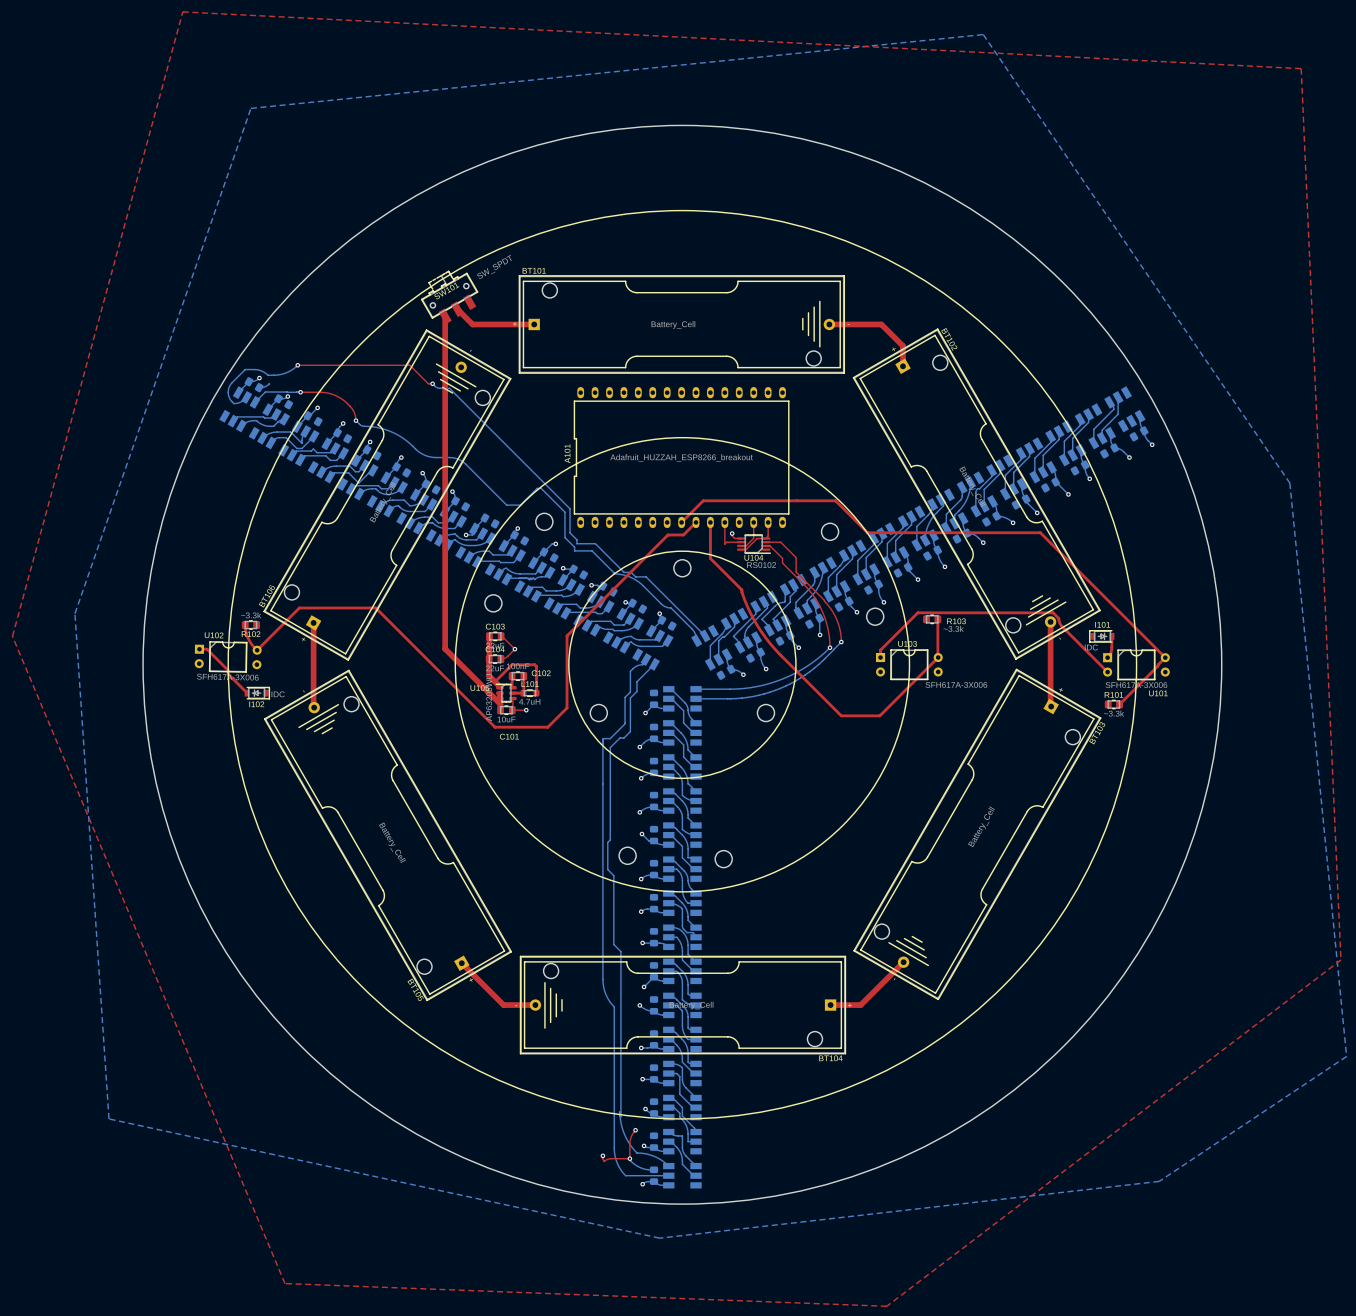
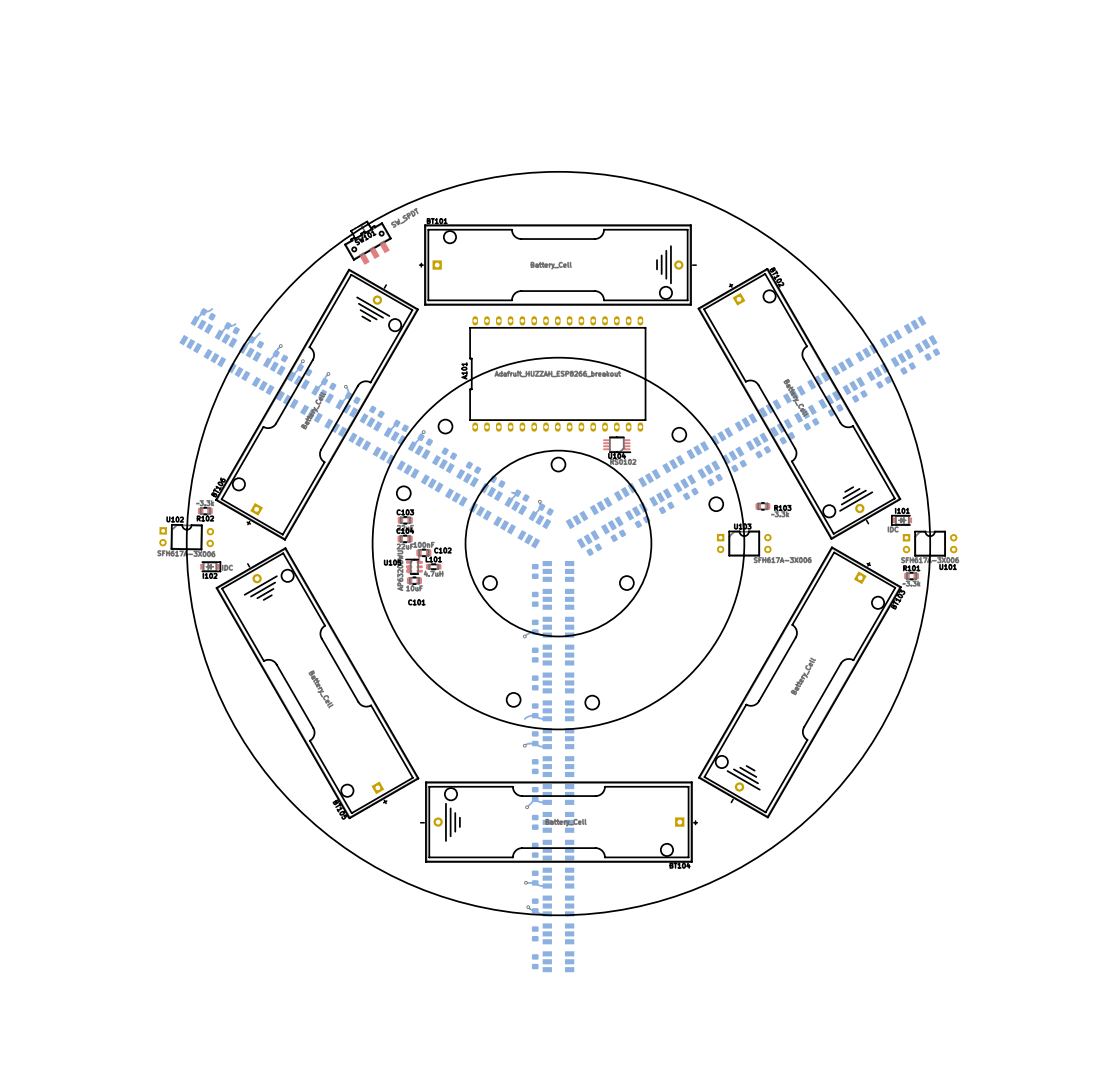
top zone outline: (182, 11) (12, 636) (284, 1283) (886, 1306) (1340, 959) (1301, 68) (182, 11) -> none
bottom zone outline: (983, 34) (250, 108) (74, 613) (109, 1118) (659, 1238) (1159, 1181) (1346, 1056) (1289, 483) (983, 34) -> none
round board edge: [142, 125, 1223, 1205] -> none
top track: (457, 309) (472, 324) (534, 324) -> none
top track: (445, 316) (445, 648) (500, 704) (500, 710) -> none
top track: (829, 324) (881, 324) (903, 346) (903, 366) -> none
top track: (297, 365) (409, 365) (428, 383) (432, 383) -> none
bottom track: (297, 365) (286, 372) (277, 375) (267, 375) (256, 369) (245, 369) (230, 384) (228, 393) (233, 403) (241, 401) (246, 397) -> none
via: (297, 365) -> none
via: (259, 378) -> none
bottom track: (269, 383) (259, 387) -> none
bottom track: (432, 383) (438, 388) (449, 388) (570, 508) (570, 532) (576, 539) (576, 543) (595, 543) (624, 572) (631, 572) (635, 576) -> none
via: (432, 383) -> none
top track: (300, 392) (323, 392) (338, 396) (351, 408) (355, 420) -> none
bottom track: (300, 392) (265, 392) (255, 402) -> none
via: (300, 392) -> none
via: (287, 396) -> none
bottom track: (1118, 397) (1118, 414) (1102, 430) (1102, 438) -> none
bottom track: (1109, 402) (1113, 409) (1093, 429) (1093, 442) -> none
via: (317, 407) -> none
bottom track: (276, 414) (272, 418) (237, 416) (233, 421) -> none
bottom track: (1088, 414) (1088, 422) (1072, 438) (1072, 455) -> none
bottom track: (1140, 416) (1140, 424) (1145, 436) (1152, 444) -> none
bottom track: (284, 419) (273, 426) (264, 425) (256, 420) (247, 422) (241, 425) -> none
bottom track: (1080, 419) (1080, 425) (1064, 441) (1064, 459) -> none
bottom track: (355, 420) (362, 426) (377, 427) (394, 433) (425, 455) (460, 460) (506, 505) (520, 505) (537, 488) (541, 488) (564, 512) (564, 537) (574, 547) (574, 550) (592, 550) (614, 573) -> none
via: (355, 420) -> none
bottom track: (305, 431) (302, 443) (290, 432) (271, 432) (262, 438) -> none
bottom track: (1059, 431) (1059, 439) (1043, 455) (1043, 472) -> none
bottom track: (1110, 433) (1113, 446) (1122, 450) (1129, 457) -> none
bottom track: (314, 436) (301, 448) (296, 448) (286, 437) (277, 438) (270, 442) -> none
bottom track: (1050, 436) (1050, 442) (1034, 458) (1034, 477) -> none
via: (1152, 444) -> none
bottom track: (335, 448) (331, 452) (317, 452) (313, 449) (311, 451) (296, 451) (292, 455) -> none
bottom track: (1029, 448) (1029, 456) (1013, 472) (1013, 489) -> none
bottom track: (1081, 450) (1081, 458) (1089, 478) -> none
bottom track: (343, 453) (336, 460) (330, 460) (325, 455) (304, 455) (300, 459) -> none
bottom track: (1021, 453) (1021, 459) (1005, 475) (1005, 494) -> none
via: (1129, 457) -> none
bottom track: (364, 465) (358, 471) (355, 471) (349, 466) (336, 466) (328, 467) (321, 472) -> none
bottom track: (1000, 465) (1000, 473) (984, 489) (984, 506) -> none
bottom track: (1051, 467) (1055, 473) (1055, 482) (1068, 494) -> none
bottom track: (373, 470) (358, 483) (348, 472) (334, 472) (329, 477) -> none
bottom track: (991, 470) (991, 476) (976, 490) (975, 511) -> none
via: (1089, 478) -> none
bottom track: (394, 482) (388, 488) (381, 488) (378, 485) (354, 485) (351, 489) -> none
bottom track: (970, 482) (965, 501) (954, 515) (954, 523) -> none
bottom track: (1022, 484) (1022, 492) (1027, 502) (1037, 512) -> none
bottom track: (402, 487) (391, 494) (383, 493) (375, 488) (367, 489) (359, 494) -> none
bottom track: (962, 487) (961, 498) (946, 514) (946, 528) -> none
bottom track: (452, 491) (455, 501) (444, 511) -> none
via: (452, 491) -> none
via: (1068, 494) -> none
bottom track: (423, 499) (417, 504) (409, 505) (404, 500) (390, 500) (380, 506) -> none
bottom track: (941, 499) (943, 505) (929, 521) (925, 540) -> none
bottom track: (992, 501) (996, 507) (996, 516) (1005, 517) (1013, 522) -> none
bottom track: (432, 504) (425, 511) (407, 511) (398, 505) (388, 511) -> none
bottom track: (932, 504) (929, 513) (916, 526) (916, 545) -> none
via: (1037, 512) -> none
bottom track: (453, 516) (447, 522) (438, 522) (432, 517) (424, 517) (416, 518) (410, 523) -> none
bottom track: (911, 516) (911, 524) (895, 540) (895, 557) -> none
bottom track: (963, 518) (965, 531) (975, 535) (983, 542) -> none
bottom track: (461, 521) (454, 528) (440, 527) (432, 522) (424, 524) (418, 528) -> none
bottom track: (903, 521) (903, 527) (887, 543) (887, 562) -> none
top track: (681, 522) (703, 500) (835, 500) (867, 532) (1040, 532) (1165, 657) (1119, 704) -> none
top track: (696, 522) (683, 534) (667, 534) (567, 635) (567, 708) (547, 727) (495, 727) (375, 607) (299, 607) (257, 650) (247, 637) (245, 625) -> none
top track: (710, 522) (710, 558) (741, 589) (753, 619) (770, 644) (841, 715) (879, 715) (938, 657) (937, 619) -> none
top track: (724, 522) (724, 544) (726, 542) (741, 542) -> none
top track: (753, 522) (753, 538) (746, 545) (741, 545) -> none
top track: (768, 522) (768, 536) (765, 538) (757, 538) (746, 549) (741, 549) -> none
via: (1013, 522) -> none
bottom track: (474, 528) (476, 530) (472, 534) (466, 534) -> none
bottom track: (482, 533) (476, 539) (462, 539) (454, 534) (446, 535) (439, 540) -> none
top track: (732, 533) (734, 538) (741, 538) -> none
via: (732, 533) -> none
bottom track: (882, 533) (882, 541) (866, 557) (866, 574) -> none
via: (466, 534) -> none
bottom track: (933, 535) (934, 543) (939, 558) (944, 566) -> none
bottom track: (491, 538) (478, 545) (465, 545) (455, 539) (447, 545) -> none
bottom track: (873, 538) (873, 544) (857, 560) (857, 579) -> none
top track: (765, 542) (780, 542) (796, 557) (796, 572) (824, 600) (835, 615) (839, 628) (841, 642) -> none
via: (983, 542) -> none
bottom track: (555, 543) (552, 543) (533, 562) -> none
via: (555, 543) -> none
top track: (765, 545) (770, 545) (782, 558) (782, 563) (814, 597) (826, 624) (830, 647) -> none
bottom track: (512, 550) (508, 554) (493, 554) (489, 551) (481, 551) (469, 557) -> none
bottom track: (852, 550) (852, 558) (836, 574) (836, 591) -> none
bottom track: (904, 552) (907, 558) (909, 570) (918, 579) -> none
bottom track: (520, 555) (513, 562) (477, 562) -> none
bottom track: (844, 555) (841, 564) (828, 577) (828, 596) -> none
via: (944, 566) -> none
bottom track: (541, 567) (535, 573) (516, 573) (506, 568) (498, 574) -> none
bottom track: (823, 567) (818, 586) (807, 600) (807, 608) -> none
bottom track: (563, 568) (573, 569) (562, 580) -> none
via: (563, 568) -> none
bottom track: (874, 569) (879, 594) (883, 602) -> none
bottom track: (550, 572) (545, 576) (533, 578) -> none
bottom track: (614, 572) (635, 579) (662, 604) (671, 607) (692, 629) (696, 640) -> none
bottom track: (814, 572) (813, 584) (795, 602) (798, 613) -> none
bottom track: (635, 576) (646, 576) (705, 635) -> none
bottom track: (525, 578) (533, 578) -> none
bottom track: (533, 578) (506, 579) -> none
via: (918, 579) -> none
bottom track: (571, 584) (559, 590) (546, 590) (542, 587) (532, 587) (528, 591) -> none
bottom track: (793, 584) (795, 590) (790, 596) (790, 602) (773, 619) (777, 625) -> none
bottom track: (591, 585) (602, 586) (592, 597) -> none
via: (591, 585) -> none
bottom track: (845, 586) (846, 596) (856, 612) -> none
bottom track: (579, 589) (567, 596) (536, 596) -> none
bottom track: (785, 589) (784, 602) (775, 605) (761, 619) (769, 630) -> none
bottom track: (600, 601) (588, 607) (580, 607) (576, 604) (561, 604) (557, 608) -> none
bottom track: (764, 601) (767, 607) (745, 631) (744, 637) (748, 642) -> none
via: (625, 602) -> none
via: (883, 602) -> none
bottom track: (815, 603) (816, 611) (819, 618) (820, 634) -> none
bottom track: (609, 606) (602, 613) (565, 613) -> none
bottom track: (755, 606) (755, 614) (733, 636) (739, 647) -> none
via: (856, 612) -> none
bottom track: (630, 618) (624, 625) (614, 625) (610, 621) (591, 621) (587, 625) -> none
bottom track: (734, 618) (734, 626) (718, 640) (718, 659) -> none
bottom track: (786, 620) (786, 629) (790, 638) (798, 647) -> none
top track: (1050, 621) (1051, 706) -> none
top track: (313, 622) (314, 707) -> none
bottom track: (638, 623) (630, 628) (621, 630) (603, 628) (597, 625) (595, 630) -> none
bottom track: (726, 623) (723, 632) (710, 645) (710, 664) -> none
via: (820, 634) -> none
bottom track: (659, 635) (655, 639) (638, 639) (628, 636) (616, 642) -> none
top track: (489, 636) (489, 675) (499, 686) -> none
top track: (501, 636) (514, 649) (506, 657) (500, 659) -> none
top track: (1111, 636) (1111, 651) (1107, 657) -> none
bottom track: (756, 637) (761, 660) (766, 669) -> none
bottom track: (668, 640) (662, 646) (639, 646) (631, 642) (624, 647) -> none
bottom track: (841, 642) (809, 671) (780, 688) (741, 698) (696, 698) -> none
via: (841, 642) -> none
via: (798, 647) -> none
bottom track: (830, 647) (802, 669) (771, 683) (743, 688) (696, 689) -> none
via: (830, 647) -> none
top track: (199, 649) (207, 649) (247, 693) -> none
via: (514, 649) -> none
bottom track: (727, 654) (729, 667) (743, 674) -> none
top track: (880, 657) (880, 650) (917, 612) (1053, 612) (1058, 618) (1062, 626) (1107, 672) -> none
bottom track: (646, 659) (642, 664) (636, 666) (630, 671) (630, 692) (625, 697) (625, 723) (610, 738) (602, 739) -> none
bottom track: (654, 664) (636, 681) (636, 691) (630, 698) (630, 731) (623, 738) (619, 738) (610, 747) (610, 839) (607, 842) (607, 869) (613, 875) (613, 944) (620, 951) (620, 1116) (619, 1115) (619, 1111) (620, 1116) (621, 1125) (628, 1142) (636, 1153) (654, 1156) (668, 1166) -> none
via: (766, 669) -> none
via: (743, 674) -> none
top track: (523, 676) (523, 692) (512, 693) -> none
top track: (495, 681) (512, 664) (534, 664) (536, 666) (536, 693) -> none
bottom track: (668, 689) (671, 689) (685, 703) (689, 716) (696, 723) -> none
top track: (512, 698) (512, 710) (526, 710) -> none
bottom track: (668, 698) (671, 698) (683, 710) (683, 723) (693, 732) (696, 732) -> none
bottom track: (668, 708) (659, 707) (653, 704) (645, 713) -> none
via: (526, 710) -> none
via: (645, 713) -> none
bottom track: (668, 723) (671, 723) (682, 734) (688, 749) (696, 757) -> none
bottom track: (668, 732) (671, 732) (683, 744) (683, 757) (693, 766) (696, 766) -> none
bottom track: (602, 738) (602, 979) (605, 994) (614, 1006) (615, 1155) (618, 1166) (625, 1175) (668, 1175) -> none
bottom track: (668, 742) (660, 742) (652, 738) (639, 747) -> none
via: (639, 747) -> none
bottom track: (668, 757) (671, 757) (682, 768) (688, 783) (696, 791) -> none
bottom track: (668, 766) (671, 766) (681, 778) (682, 795) -> none
bottom track: (668, 791) (674, 793) (684, 802) (688, 818) (696, 825) -> none
bottom track: (682, 795) (696, 801) -> none
bottom track: (668, 801) (671, 801) (681, 812) (682, 829) -> none
bottom track: (668, 810) (651, 807) (639, 812) -> none
via: (639, 812) -> none
bottom track: (668, 825) (674, 827) (685, 839) (688, 857) (696, 859) -> none
bottom track: (682, 829) (696, 835) -> none
bottom track: (641, 834) (648, 840) (668, 844) -> none
via: (641, 834) -> none
bottom track: (668, 835) (682, 846) (682, 857) (696, 869) -> none
bottom track: (668, 859) (674, 861) (684, 871) (689, 886) (696, 893) -> none
bottom track: (668, 869) (676, 869) (679, 871) (682, 877) (684, 899) (688, 903) (696, 903) -> none
via: (641, 879) -> none
bottom track: (668, 893) (674, 895) (684, 905) (688, 920) (696, 927) -> none
bottom track: (668, 903) (682, 908) -> none
bottom track: (682, 908) (682, 928) (687, 932) (692, 932) (697, 937) (696, 937) -> none
bottom track: (668, 927) (677, 928) (684, 933) (687, 942) (688, 954) (696, 961) -> none
bottom track: (668, 937) (676, 937) (678, 939) (682, 948) (682, 959) (696, 971) -> none
bottom track: (642, 942) (662, 943) (668, 946) -> none
via: (642, 942) -> none
bottom track: (668, 961) (674, 963) (685, 975) (688, 994) (696, 995) -> none
top track: (903, 962) (860, 1005) (830, 1005) -> none
top track: (461, 963) (503, 1005) (535, 1005) -> none
bottom track: (668, 971) (676, 971) (680, 976) (682, 999) -> none
bottom track: (668, 995) (674, 997) (686, 1010) (688, 1028) (696, 1029) -> none
bottom track: (682, 999) (696, 1005) -> none
bottom track: (639, 1005) (659, 1014) (668, 1015) -> none
via: (639, 1005) -> none
bottom track: (668, 1005) (676, 1005) (682, 1011) (683, 1033) (688, 1039) (696, 1039) -> none
bottom track: (668, 1029) (674, 1031) (685, 1043) (688, 1062) (696, 1063) -> none
bottom track: (668, 1039) (679, 1049) (682, 1062) (696, 1073) -> none
bottom track: (641, 1047) (654, 1045) (659, 1048) (668, 1049) -> none
via: (641, 1047) -> none
bottom track: (668, 1063) (676, 1064) (682, 1067) (683, 1083) (696, 1097) -> none
bottom track: (668, 1073) (676, 1073) (679, 1076) (679, 1094) (691, 1106) (696, 1107) -> none
bottom track: (668, 1097) (672, 1097) (682, 1107) (682, 1116) (696, 1131) -> none
bottom track: (668, 1107) (674, 1107) (679, 1113) (679, 1117) (687, 1128) (688, 1141) (696, 1141) -> none
top track: (635, 1130) (630, 1140) (629, 1158) (609, 1158) (604, 1161) (602, 1155) -> none
via: (635, 1130) -> none
bottom track: (668, 1131) (674, 1135) (682, 1135) (683, 1152) (696, 1166) -> none
bottom track: (668, 1141) (679, 1151) (682, 1164) (696, 1175) -> none
bottom track: (644, 1145) (660, 1151) (668, 1151) -> none
via: (644, 1145) -> none
via: (602, 1155) -> none
bottom track: (629, 1158) (640, 1167) (654, 1169) -> none
via: (629, 1158) -> none
bottom track: (642, 1184) (654, 1181) (659, 1184) (668, 1185) -> none
via: (642, 1184) -> none

